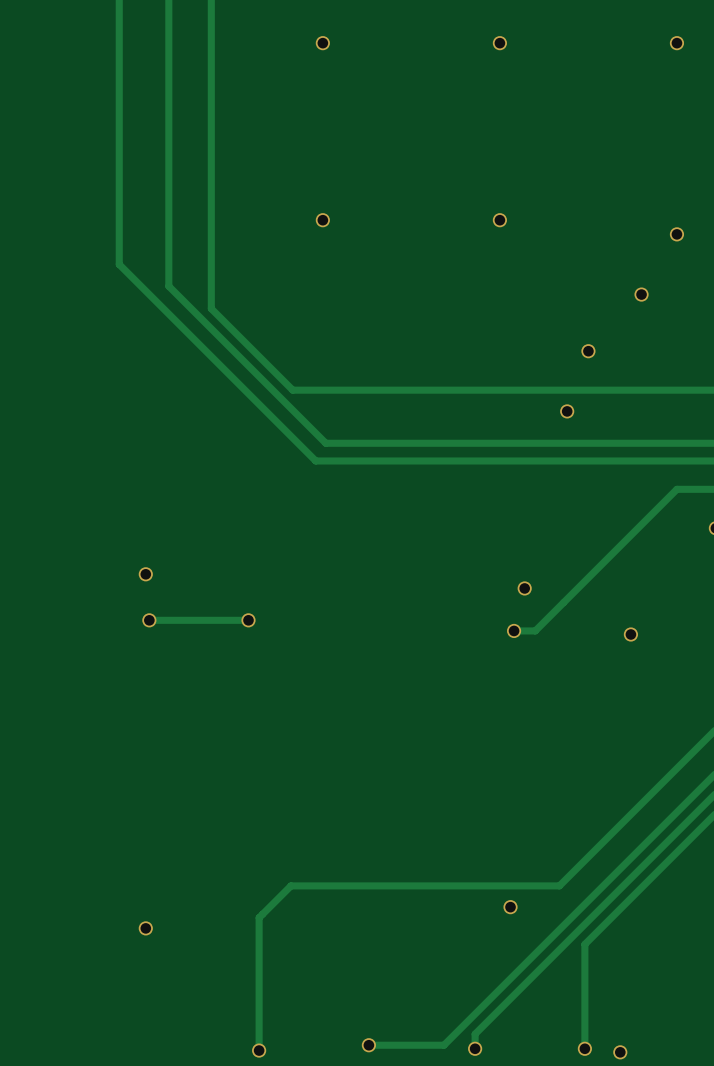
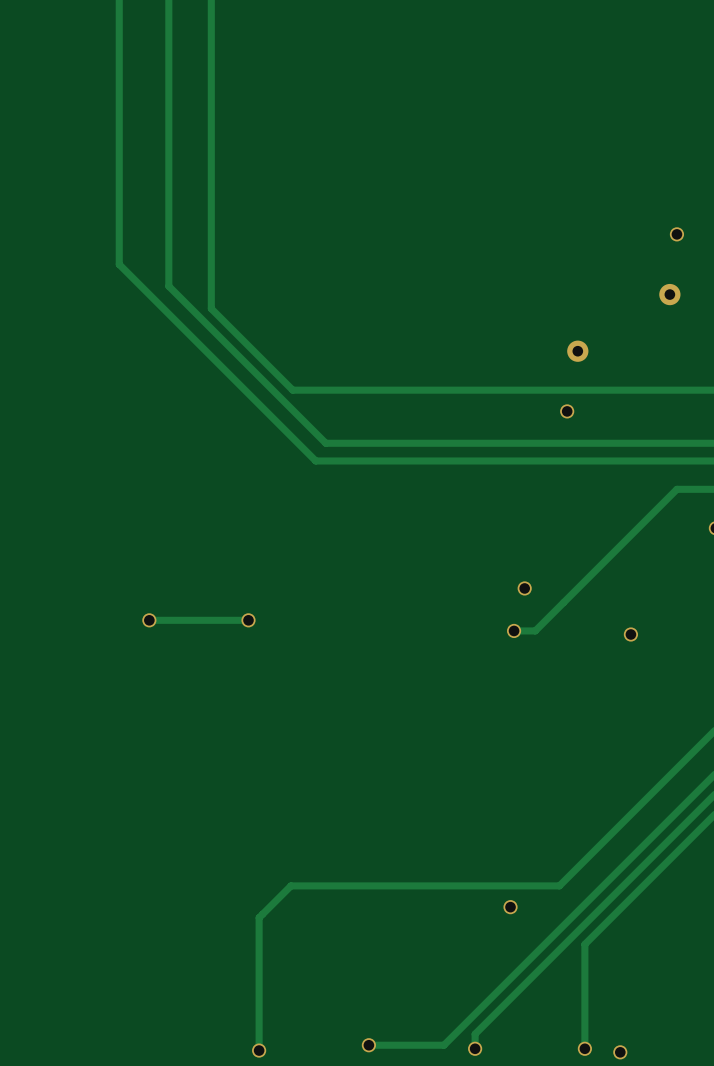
via: (322, 43) -> none
via: (499, 43) -> none
via: (676, 43) -> none
via: (322, 220) -> none
via: (499, 220) -> none
via: (641, 294) -> none
via: none -> (669, 294)
via size: [581, 344, 596, 359] -> [567, 340, 589, 362]
via: (145, 574) -> none
via: (145, 928) -> none

